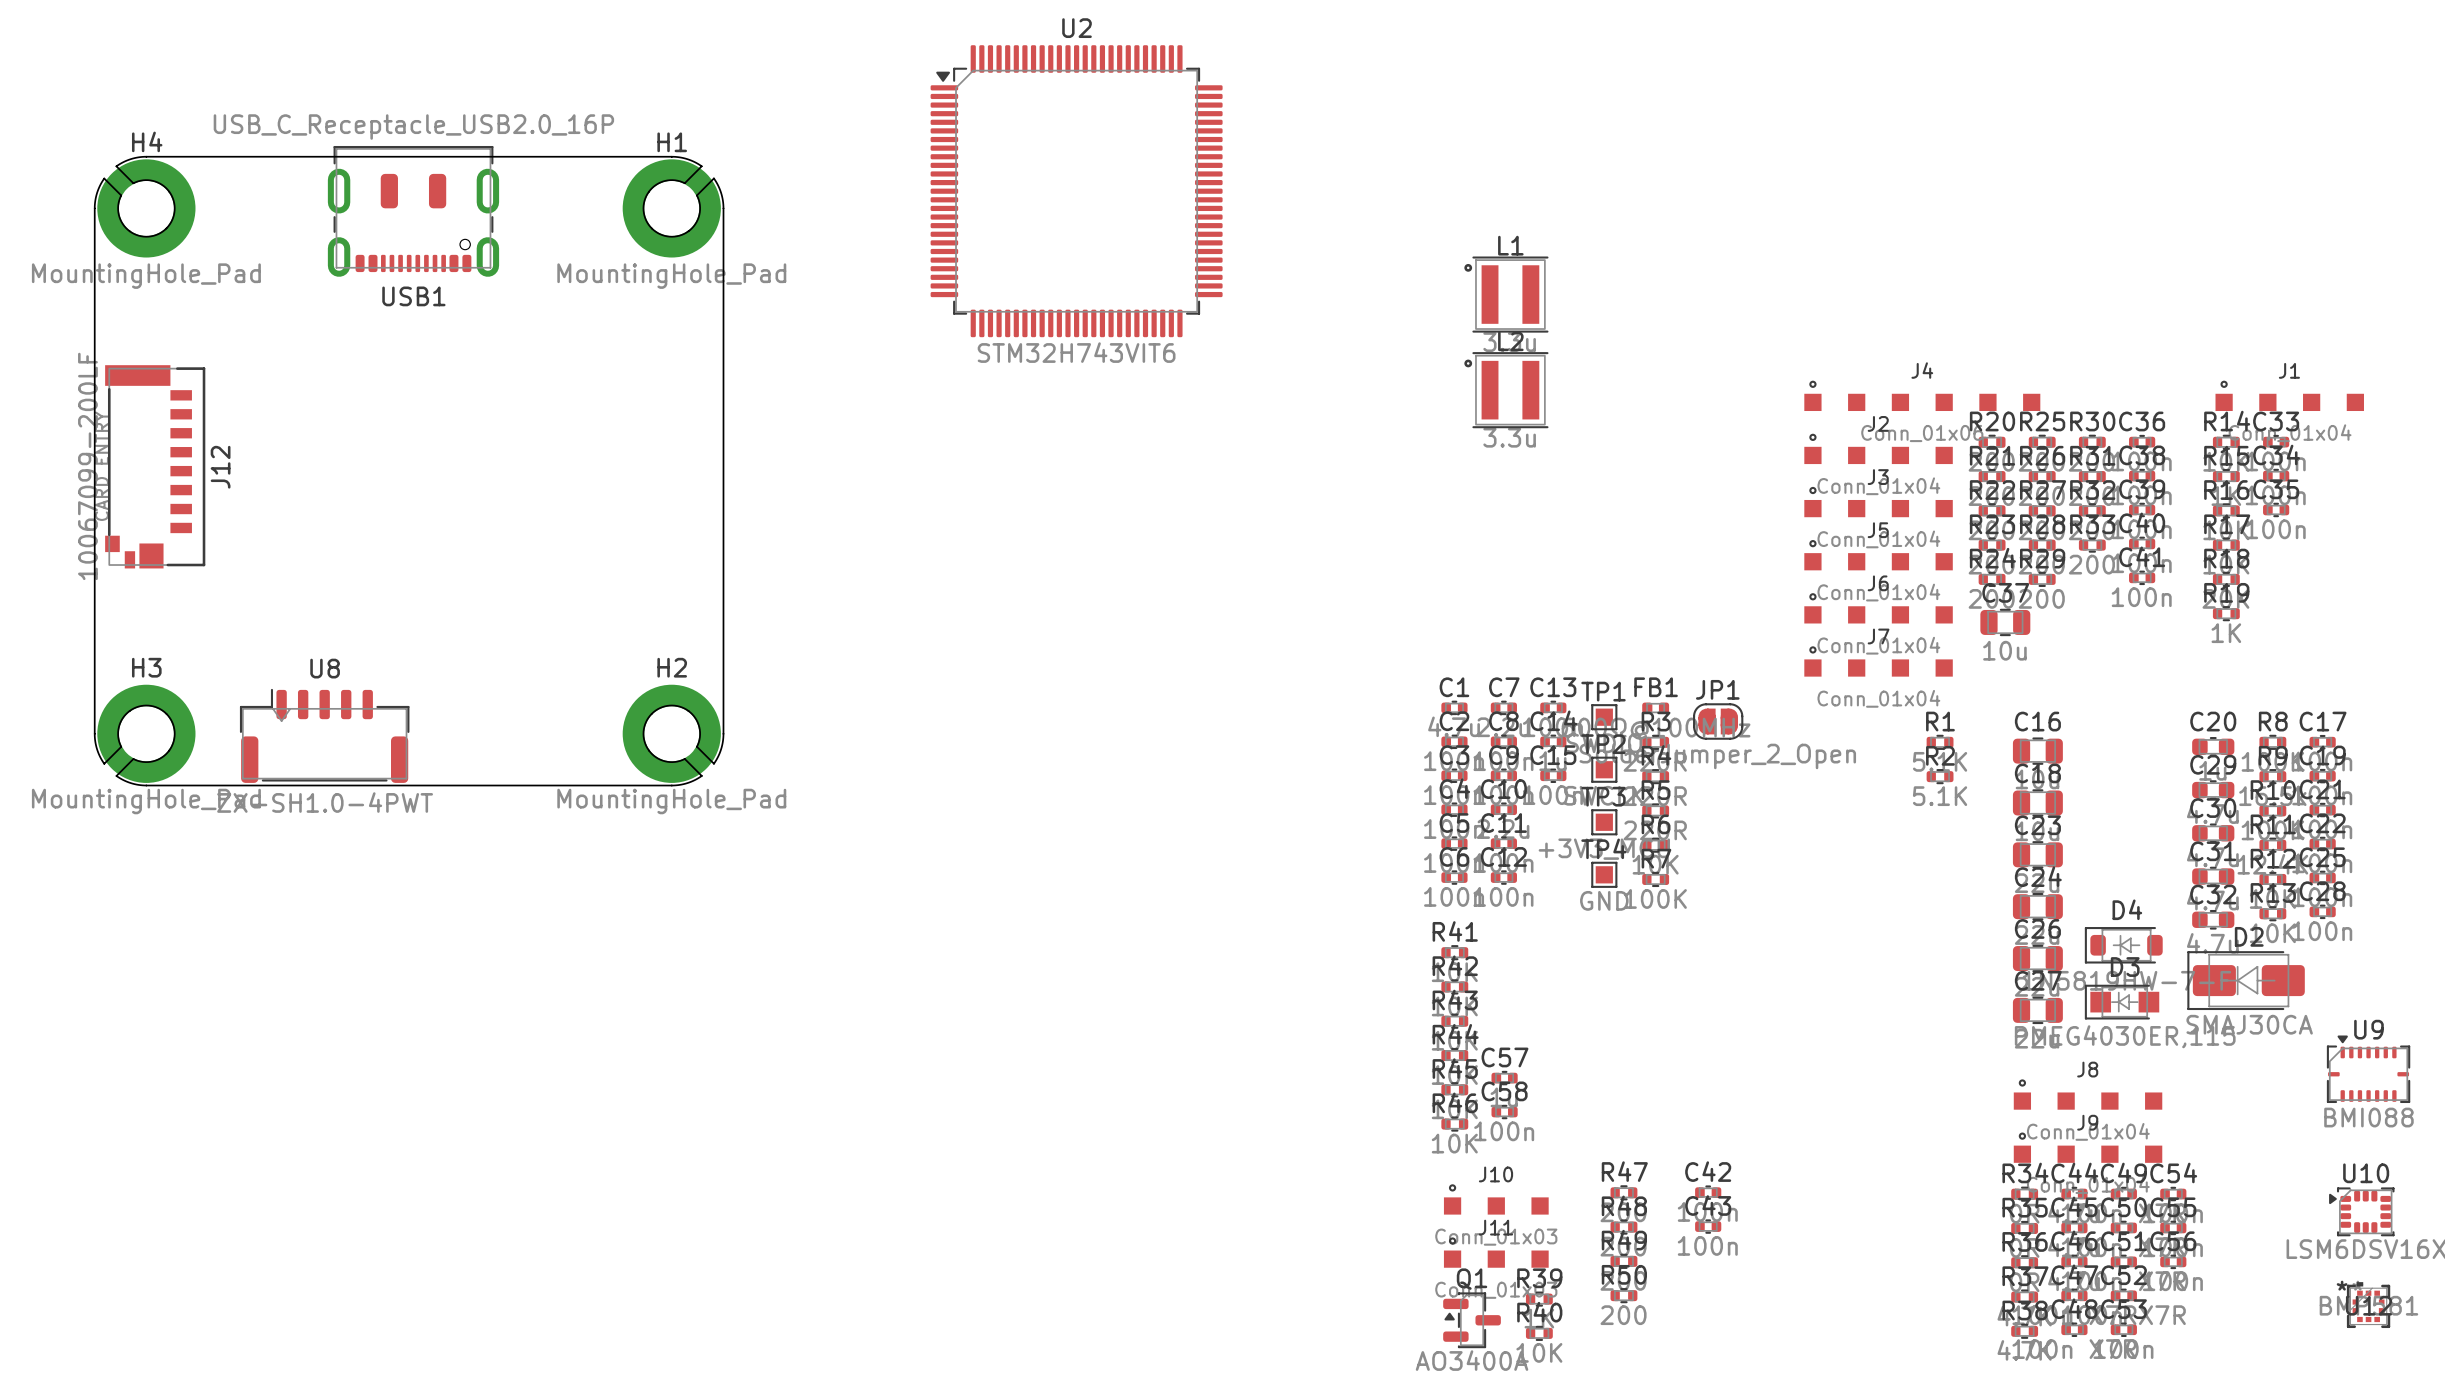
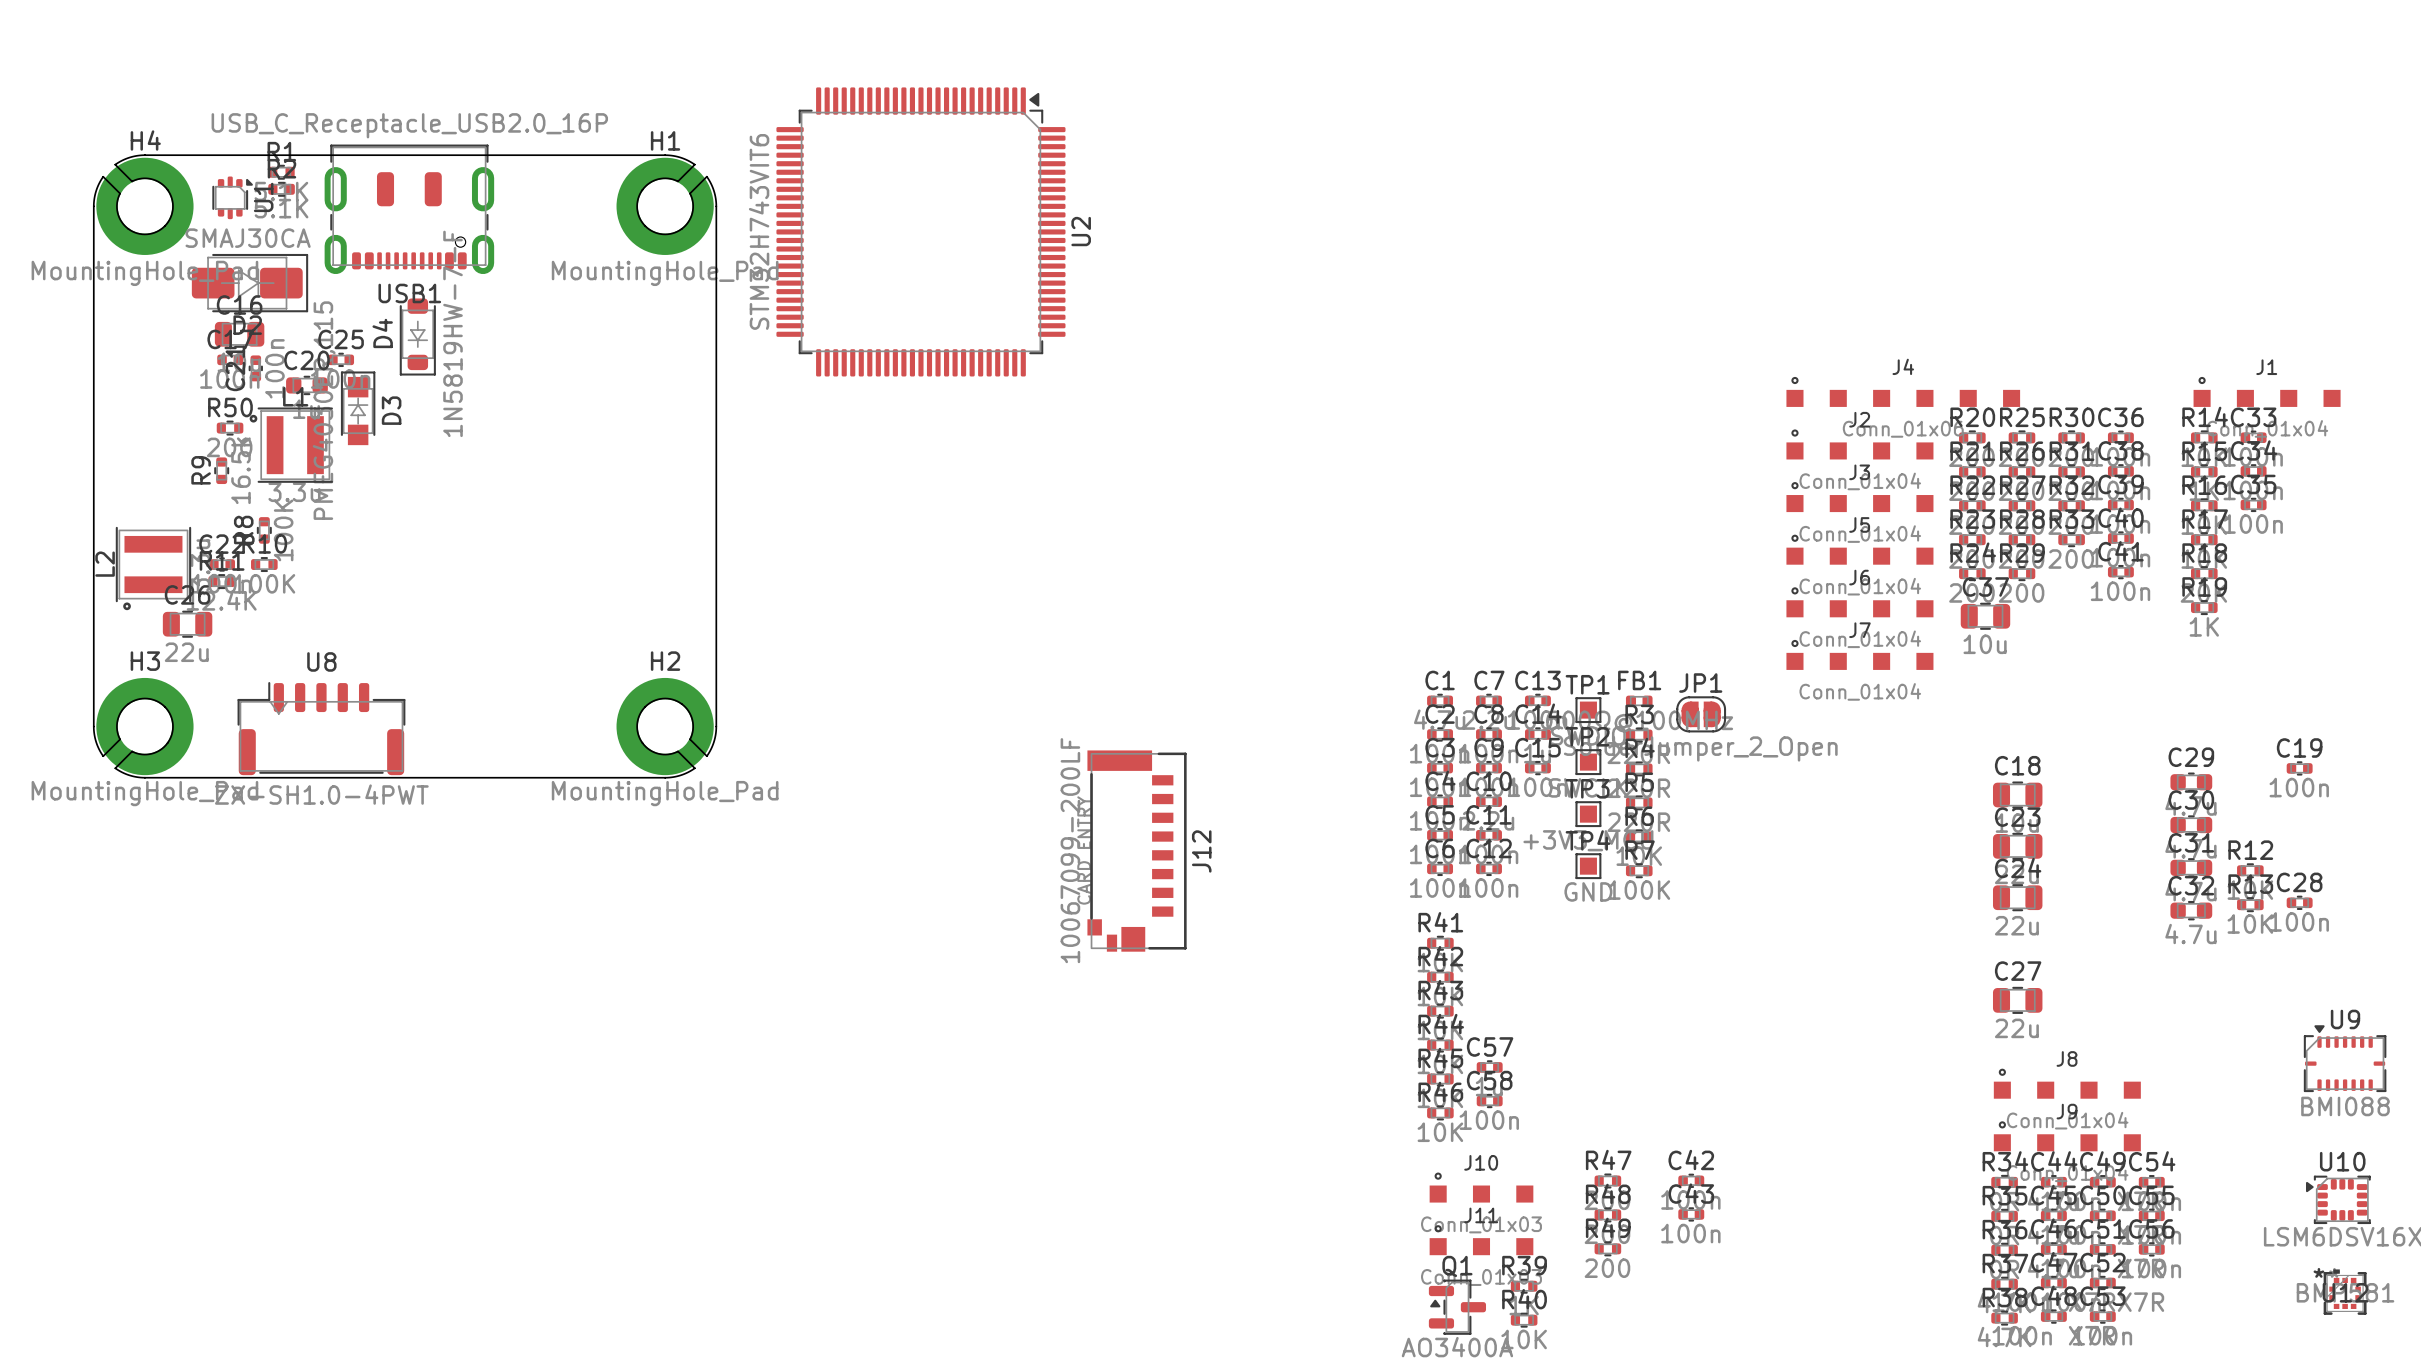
U2 rotation: 0° (1076, 191) -> 90° clockwise (920, 231)
U1: none -> (232, 197)
L1 position: (1506, 294) -> (291, 445)
L2 rotation: 0° (1506, 390) -> 90° counterclockwise (153, 568)
L2 position: (1506, 390) -> (153, 568)
J12 position: (155, 466) -> (1137, 851)
R1 position: (1940, 742) -> (281, 172)
R8 rotation: 0° (2272, 742) -> 90° clockwise (264, 530)
R8 position: (2272, 742) -> (264, 530)
C17 position: (2322, 742) -> (230, 359)
C20 position: (2213, 746) -> (306, 385)
C16 position: (2037, 751) -> (239, 334)
R2 position: (1940, 776) -> (281, 189)
R9 rotation: 0° (2272, 776) -> 90° clockwise (221, 470)
R9 position: (2272, 776) -> (221, 470)
R10 position: (2272, 810) -> (264, 564)
C21 rotation: 0° (2322, 810) -> 90° clockwise (255, 368)
C21 position: (2322, 810) -> (255, 368)
C22 position: (2322, 843) -> (222, 564)
R11 position: (2272, 845) -> (221, 581)
C25 position: (2322, 877) -> (341, 359)
D4 rotation: 0° (2123, 945) -> 90° counterclockwise (417, 337)
D4 position: (2123, 945) -> (417, 337)
C26 position: (2037, 958) -> (187, 624)
D2 rotation: 0° (2246, 980) -> 180° (250, 283)
D2 position: (2246, 980) -> (250, 283)
D3 rotation: 0° (2122, 1002) -> 90° clockwise (358, 408)
D3 position: (2122, 1002) -> (358, 408)
R50 position: (1623, 1295) -> (230, 428)

